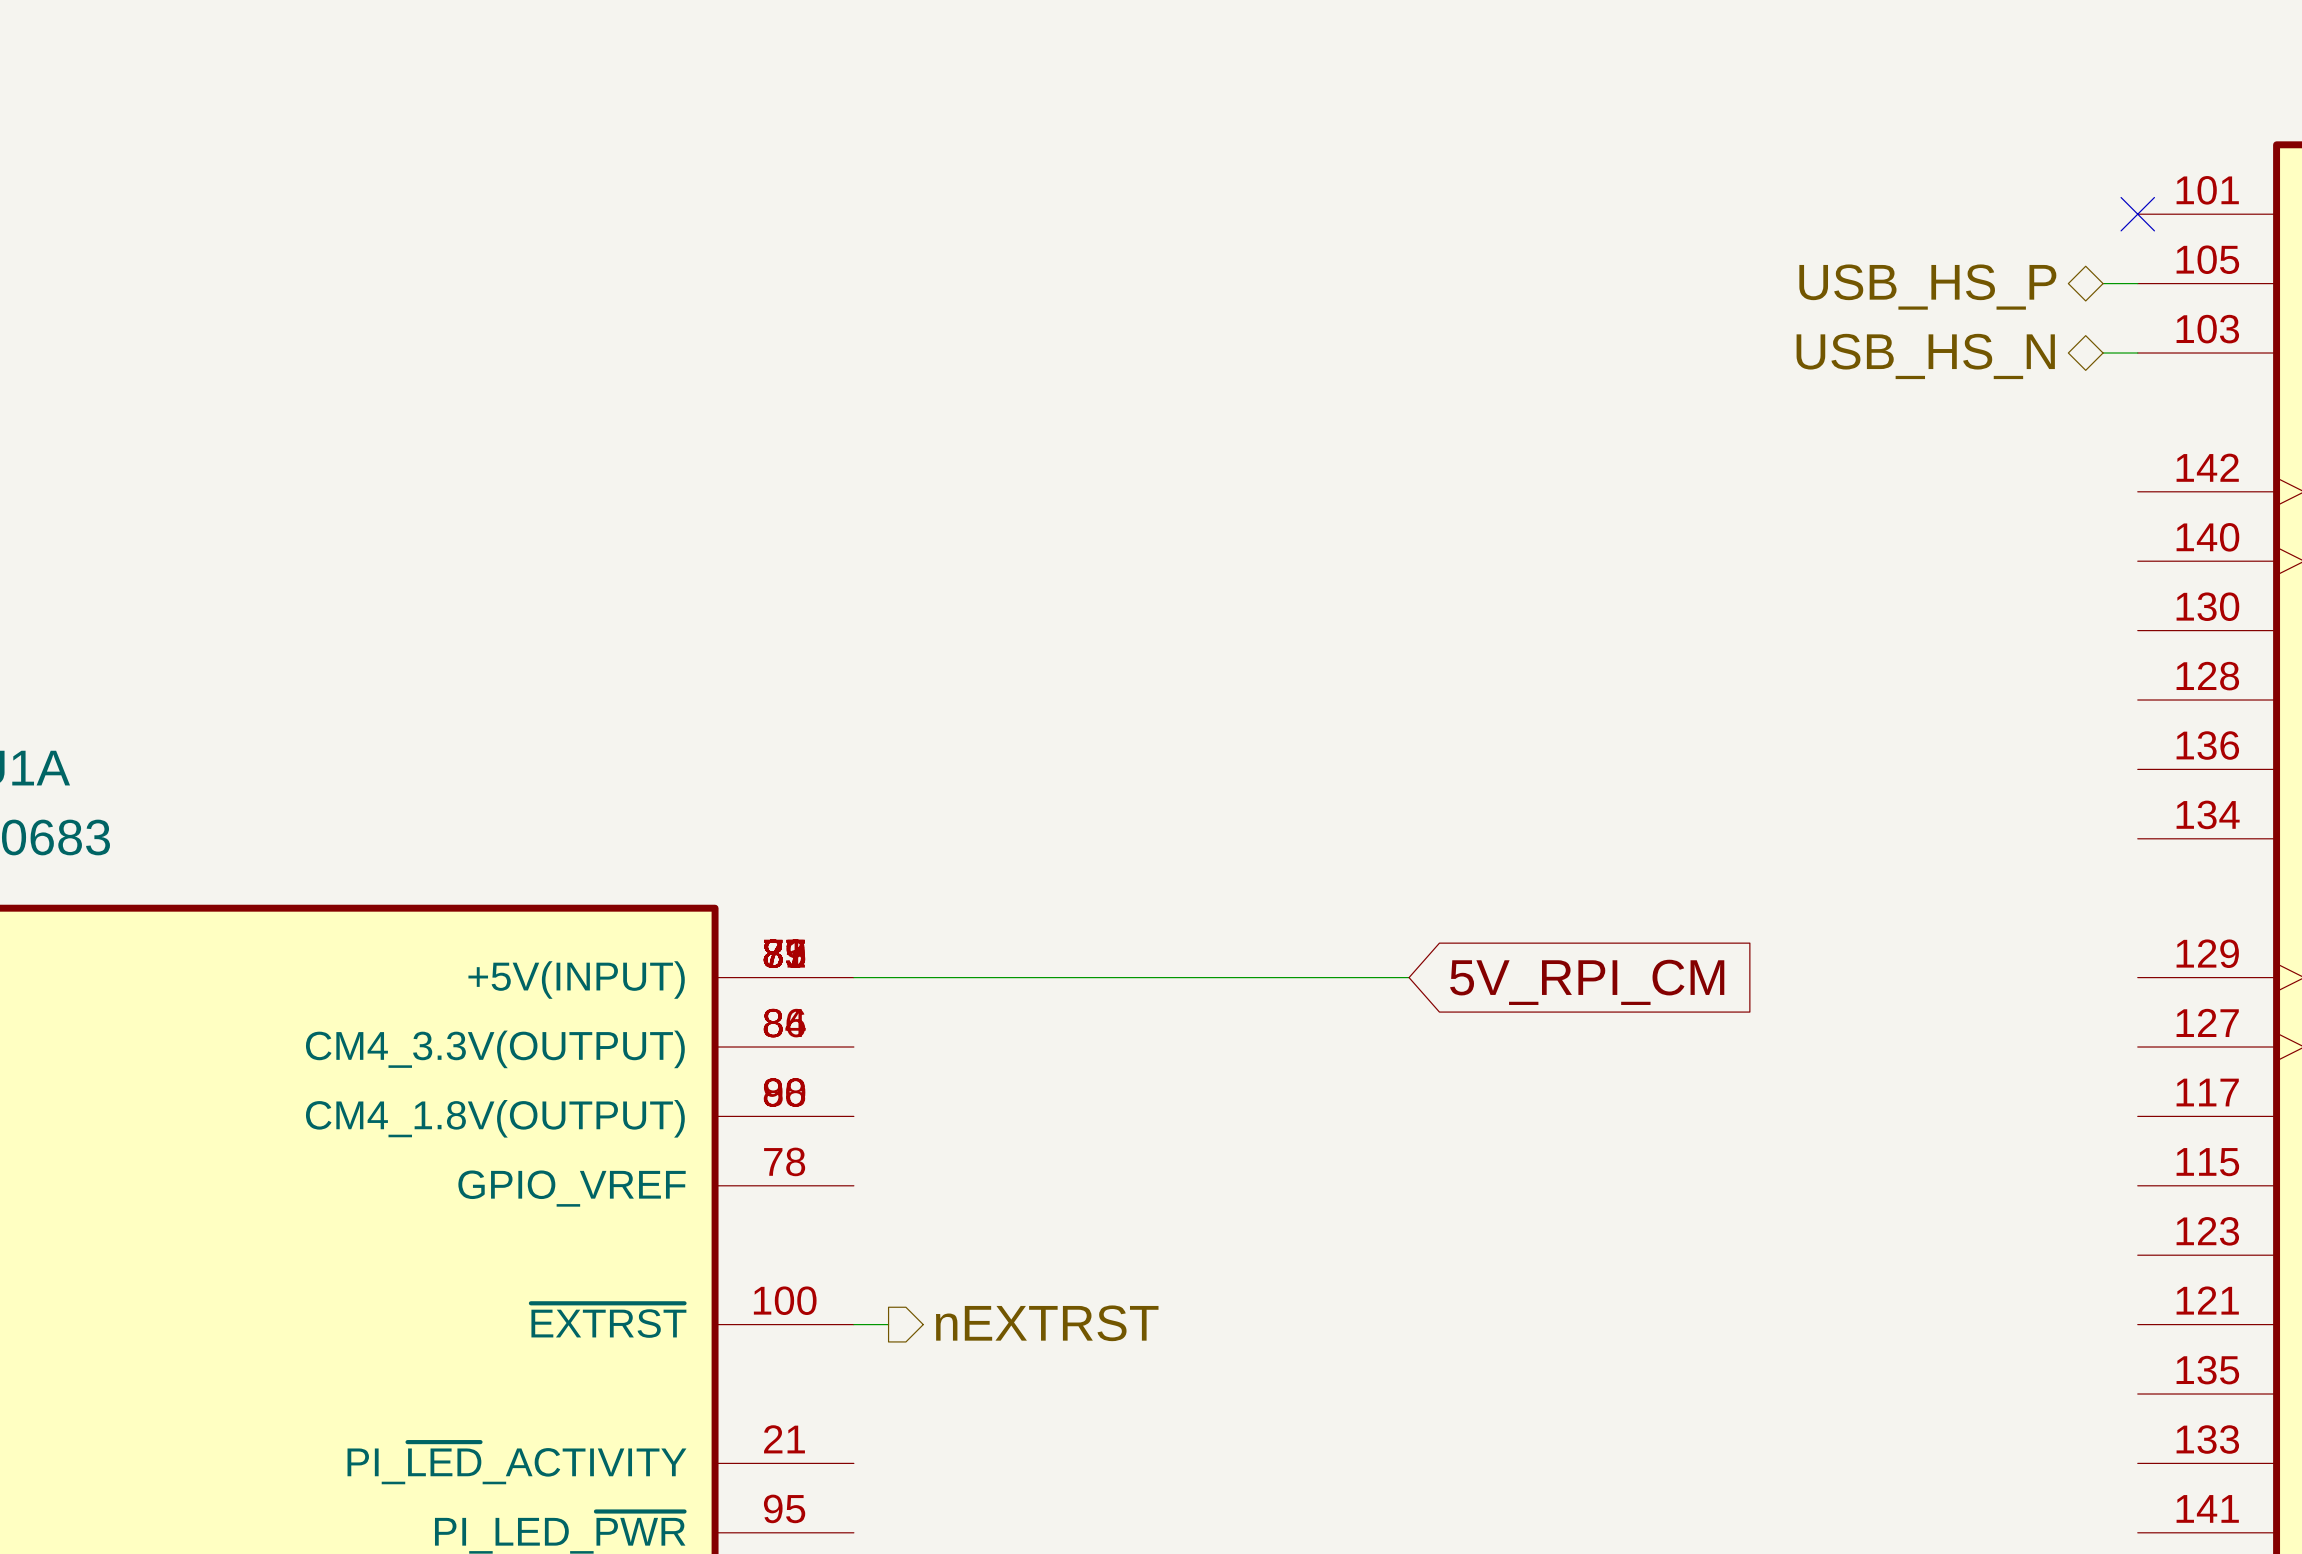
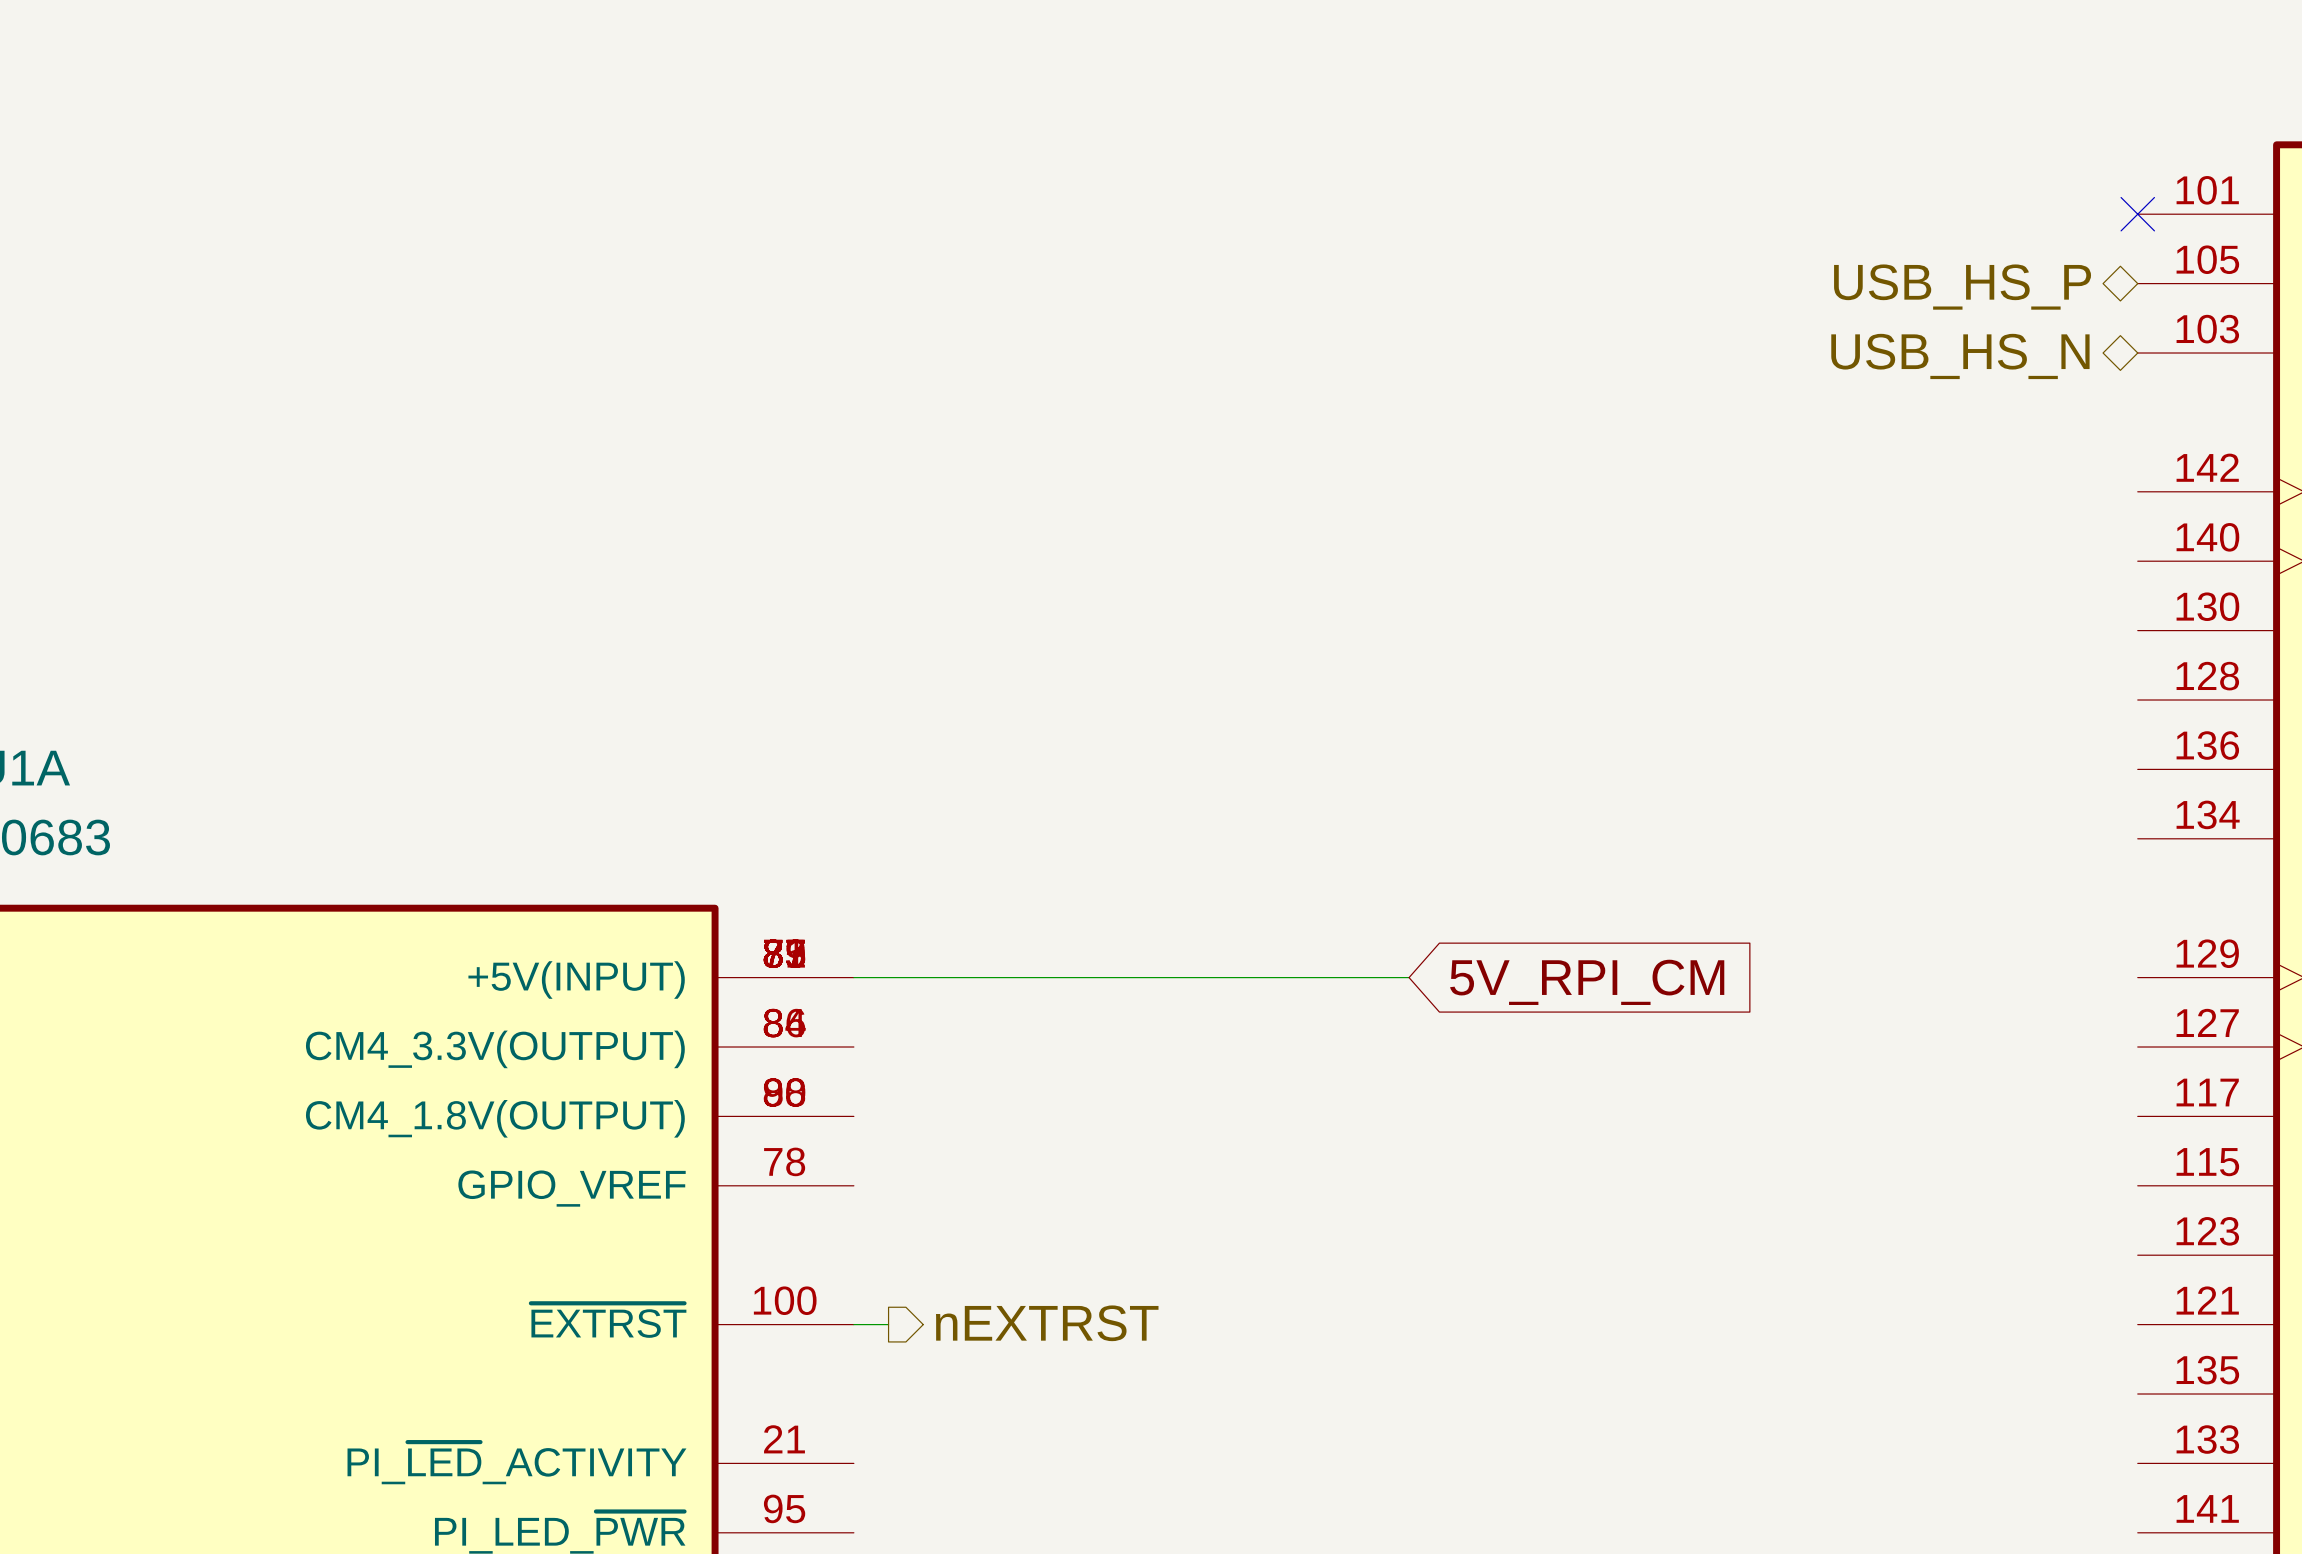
wire: (2103, 283) (2137, 283) -> none
hierarchical label position: USB_HS_P (1927, 287) -> USB_HS_P (1962, 287)
wire: (2103, 353) (2137, 353) -> none
hierarchical label position: USB_HS_N (1925, 356) -> USB_HS_N (1960, 356)

